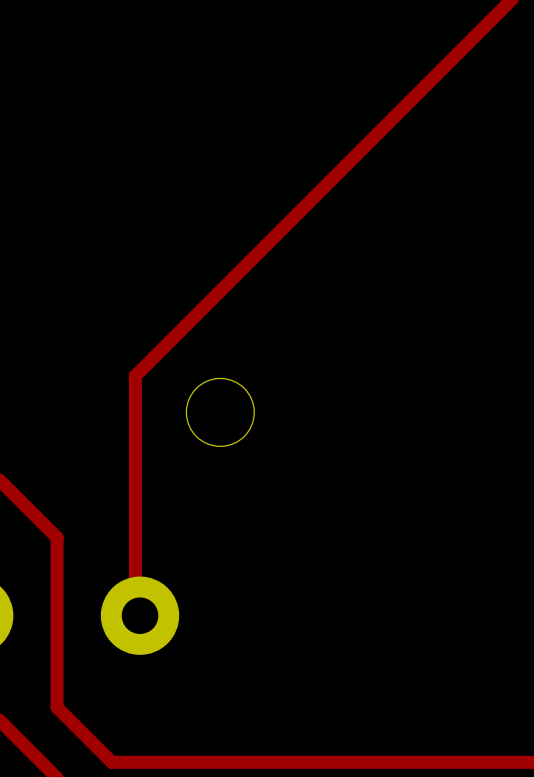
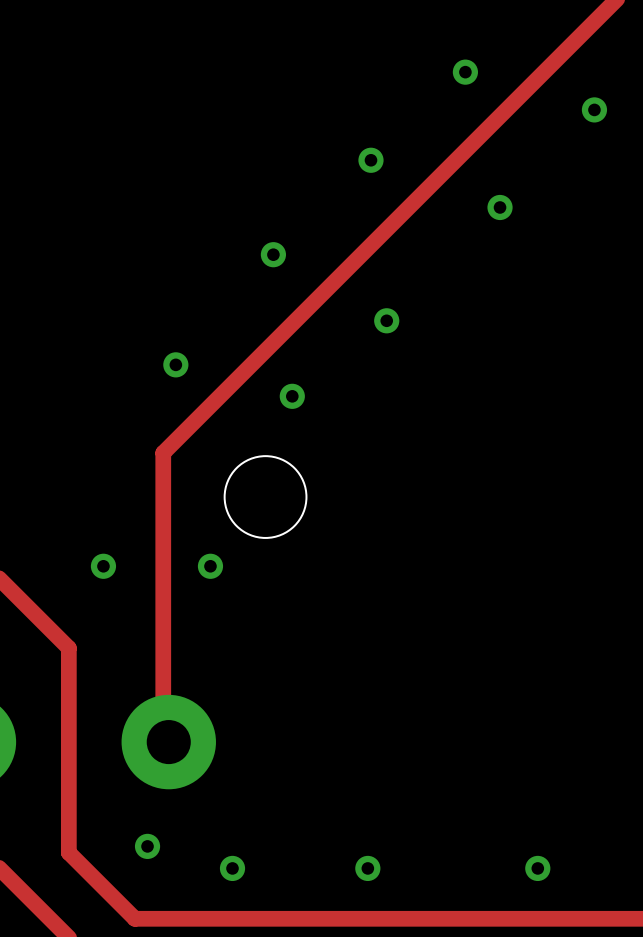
via: none -> (465, 72)
via: none -> (594, 109)
via: none -> (370, 160)
via: none -> (500, 207)
via: none -> (273, 254)
via: none -> (386, 320)
via: none -> (175, 364)
via: none -> (292, 396)
via: none -> (103, 566)
via: none -> (210, 566)
via: none -> (147, 846)
via: none -> (232, 868)
via: none -> (367, 868)
via: none -> (537, 868)

